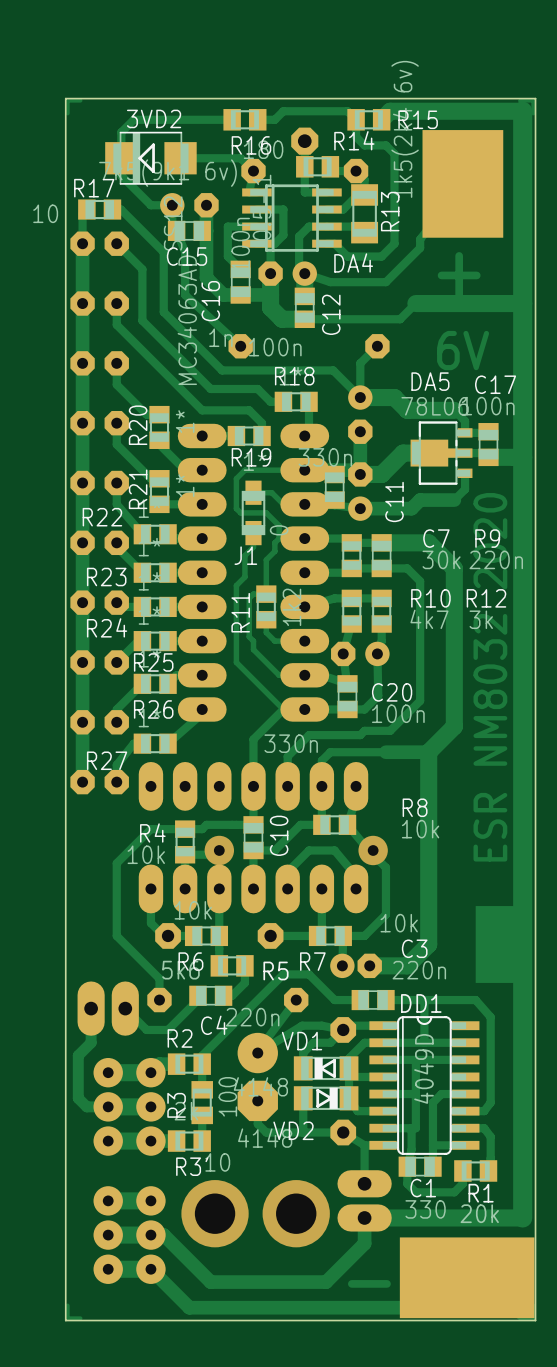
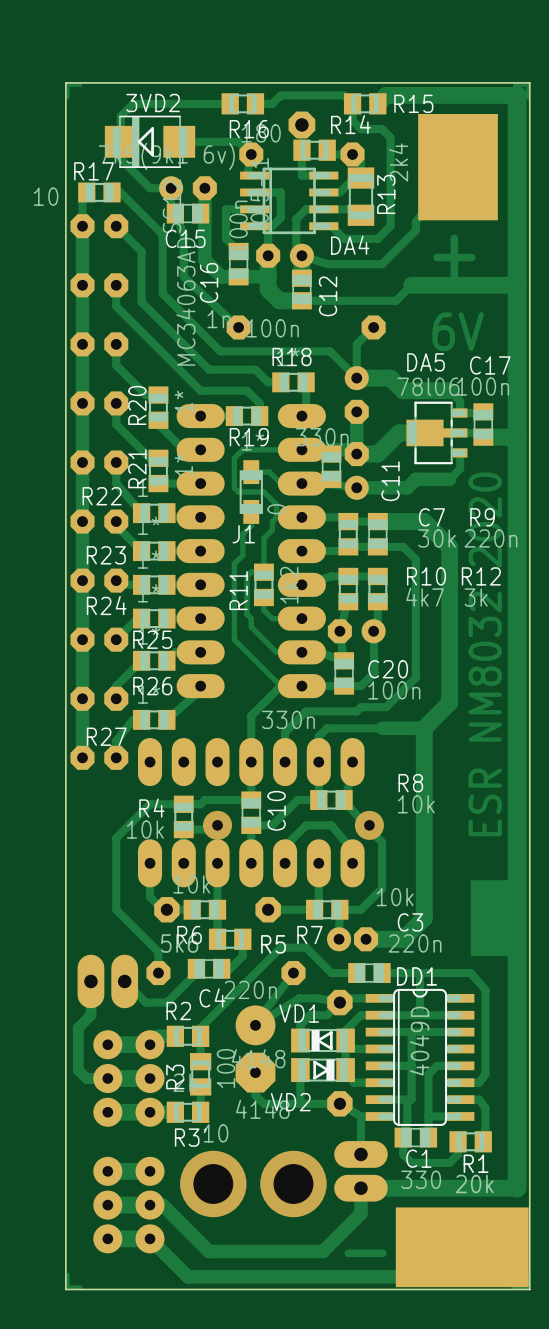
R15 value: 1k5(2k4 6v) (405, 129) -> 2k4 (398, 162)
DA5 value: 78L06 (435, 406) -> 78l06 (428, 386)

